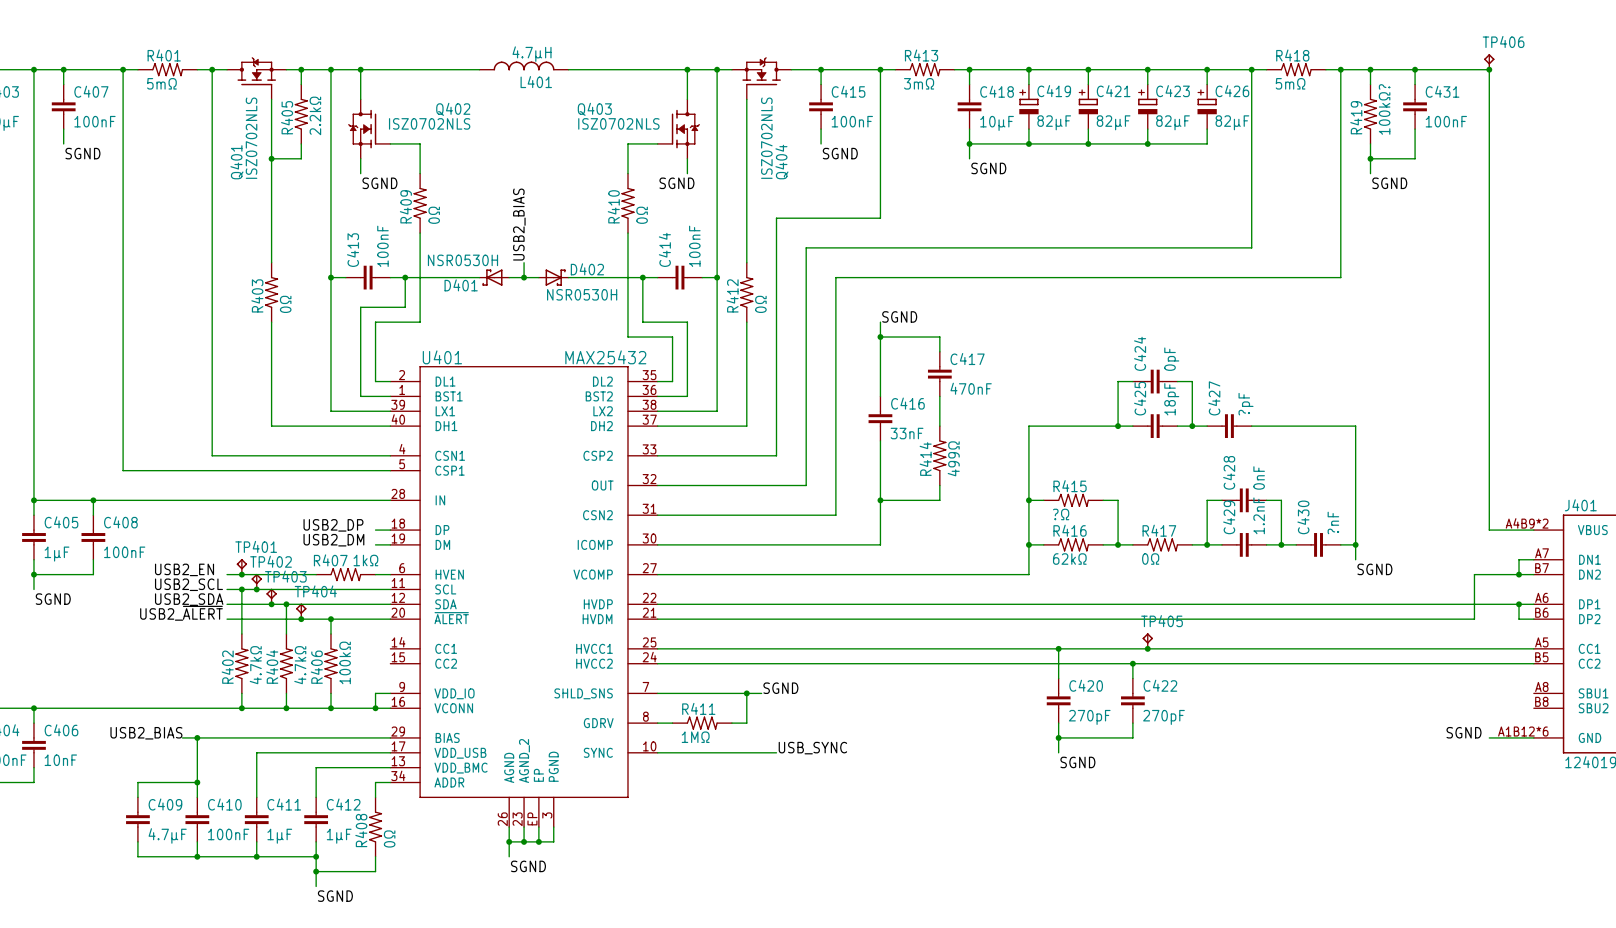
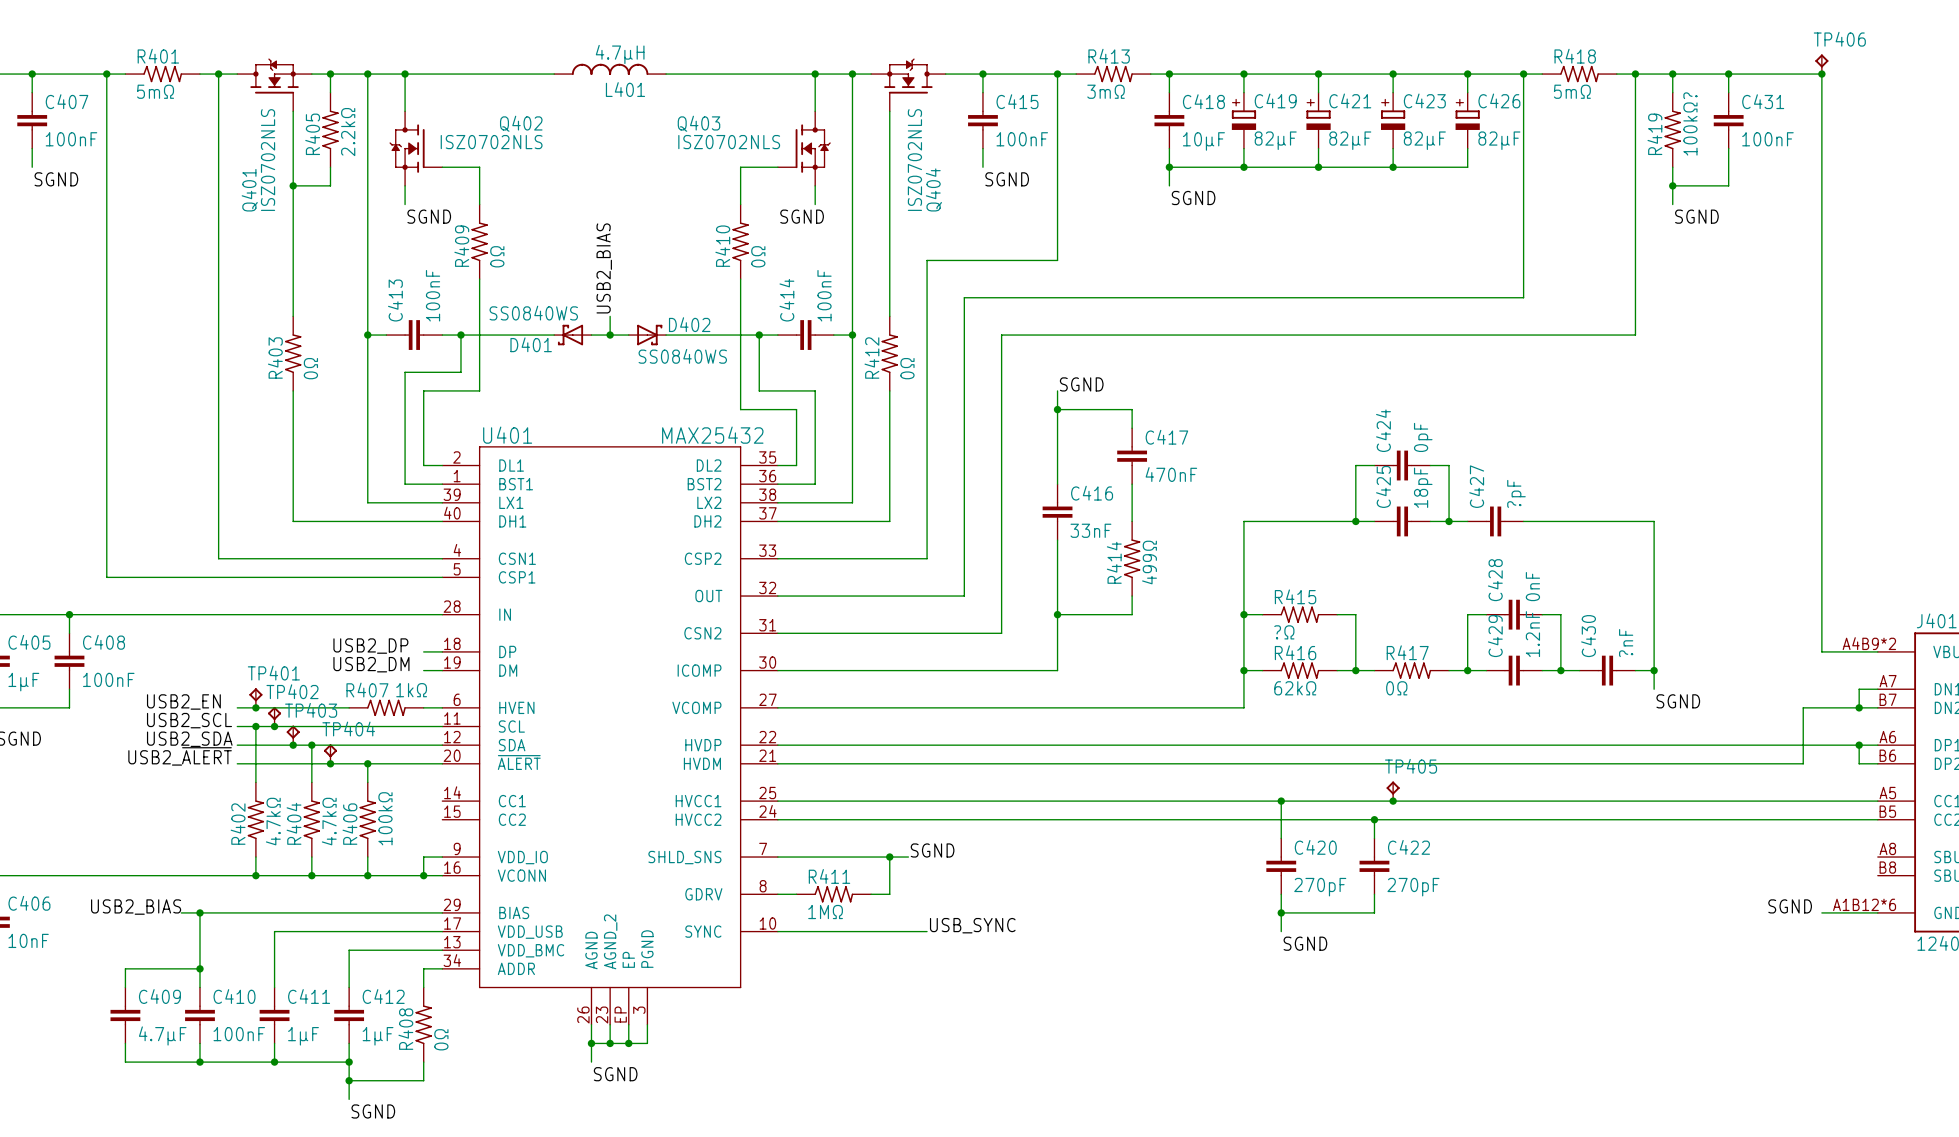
D401 value: NSR0530H (462, 260) -> SS0840WS (533, 313)
D402 value: NSR0530H (582, 294) -> SS0840WS (682, 356)

